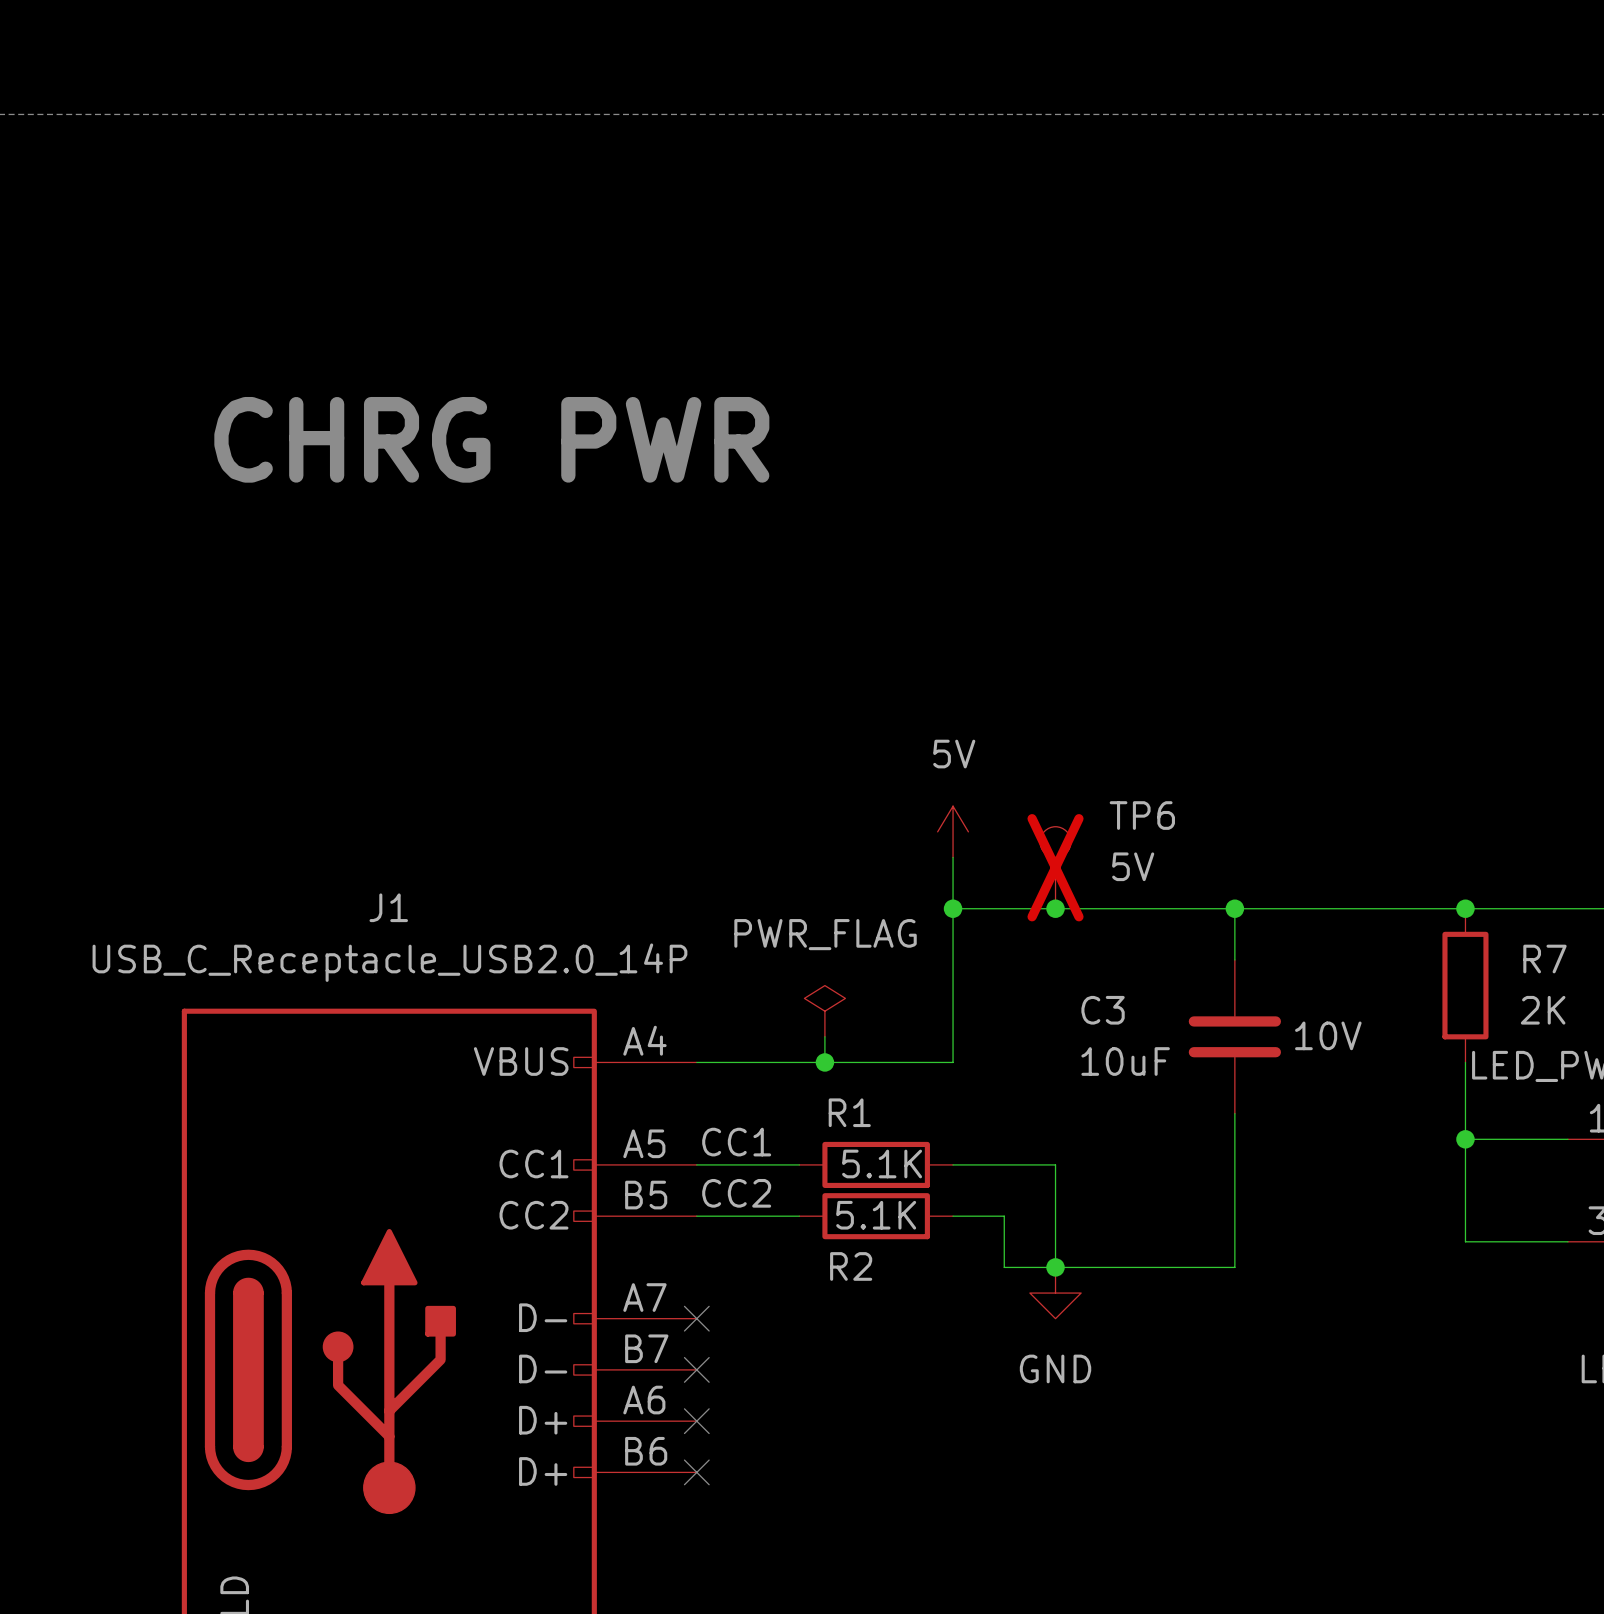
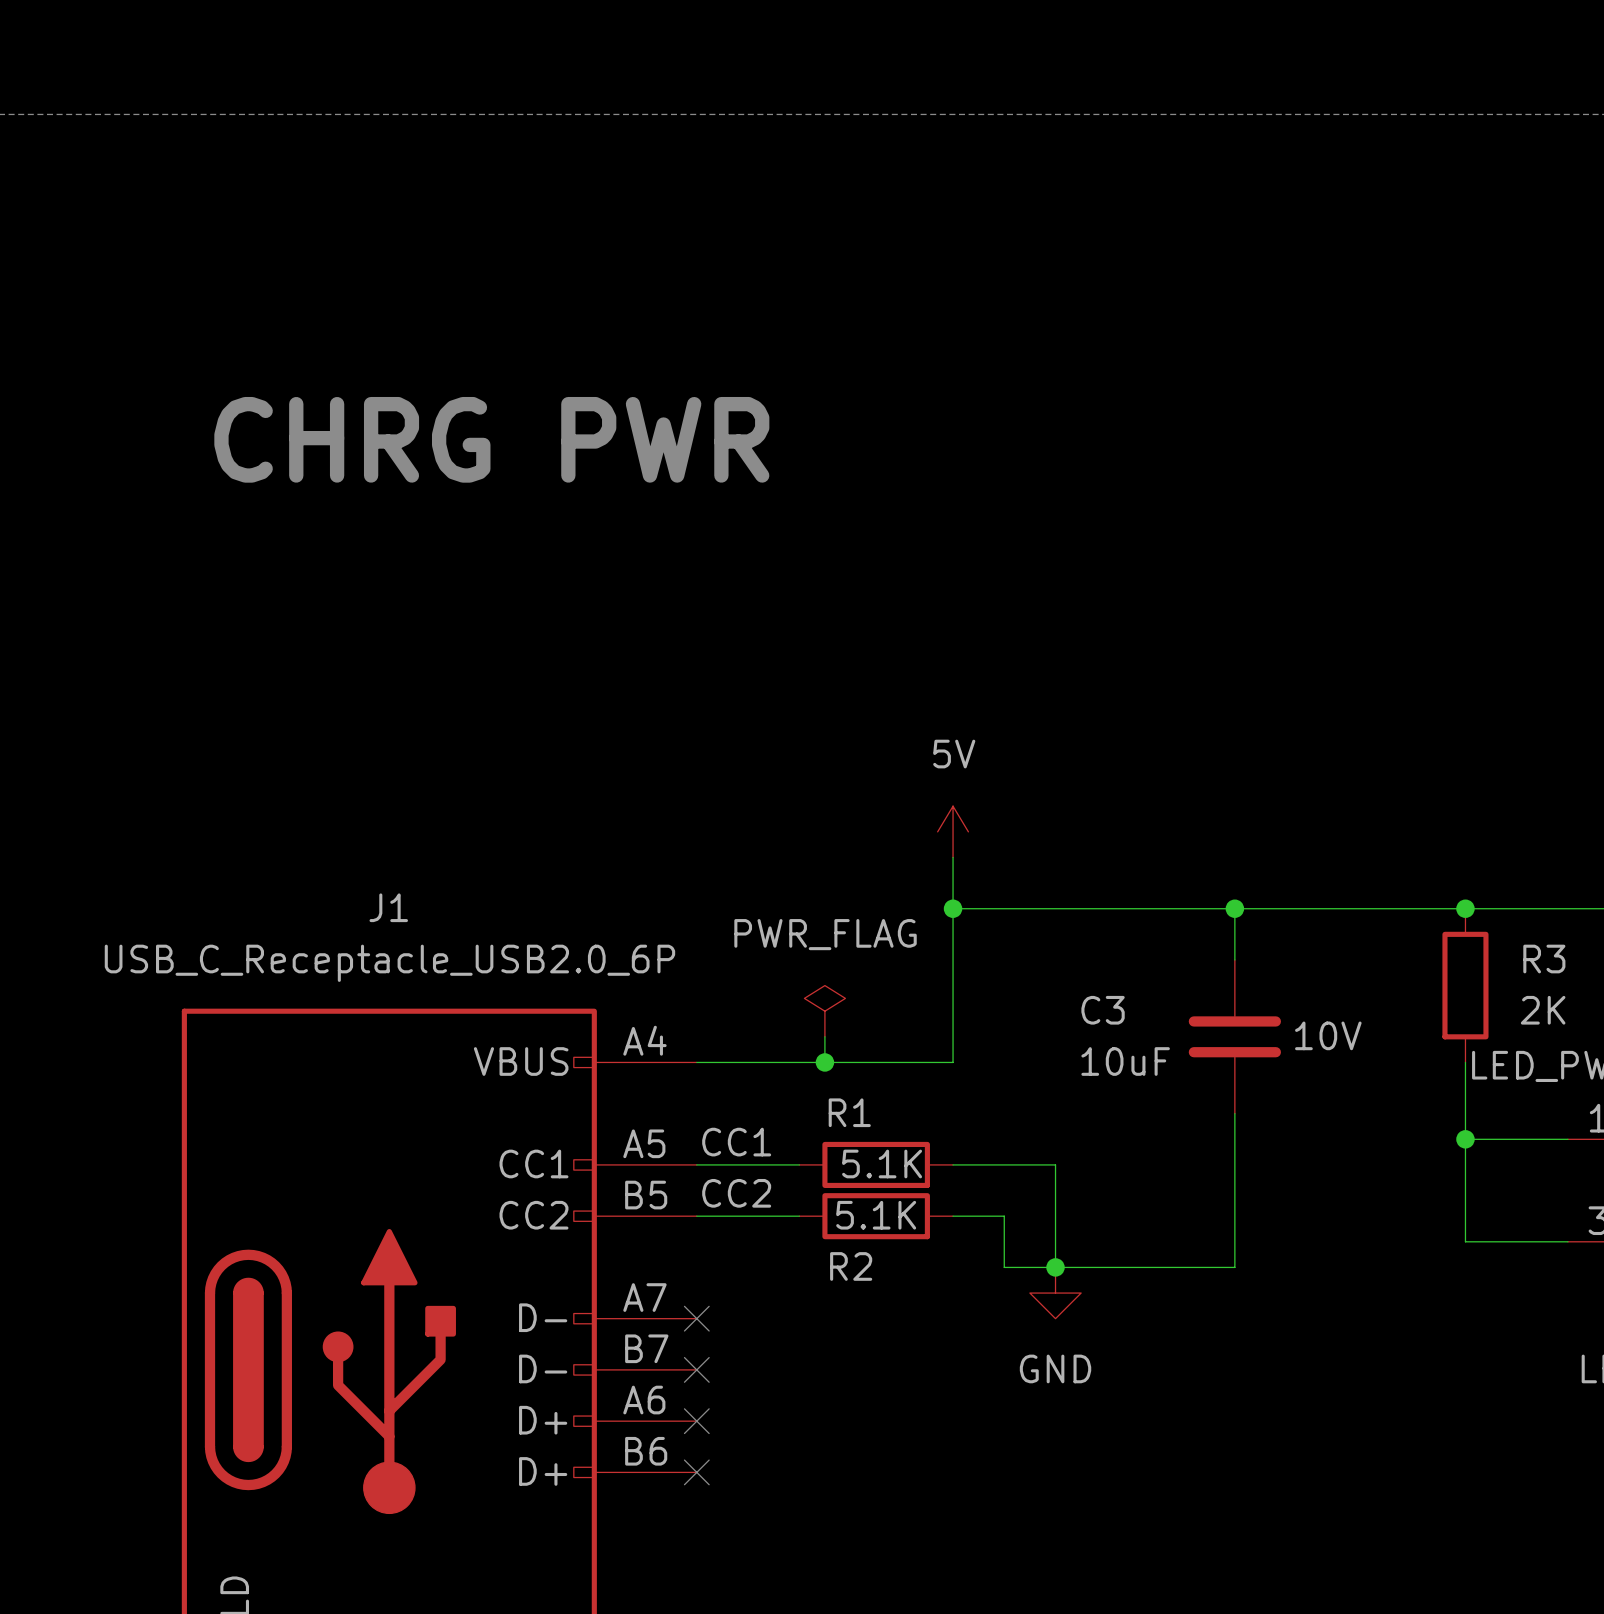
TP6: 5V (1055, 867) -> none
junction: (1055, 908) -> none
R7 name: R7 (1544, 959) -> R3 (1544, 959)
J1 value: USB_C_Receptacle_USB2.0_14P (389, 962) -> USB_C_Receptacle_USB2.0_6P (389, 963)

